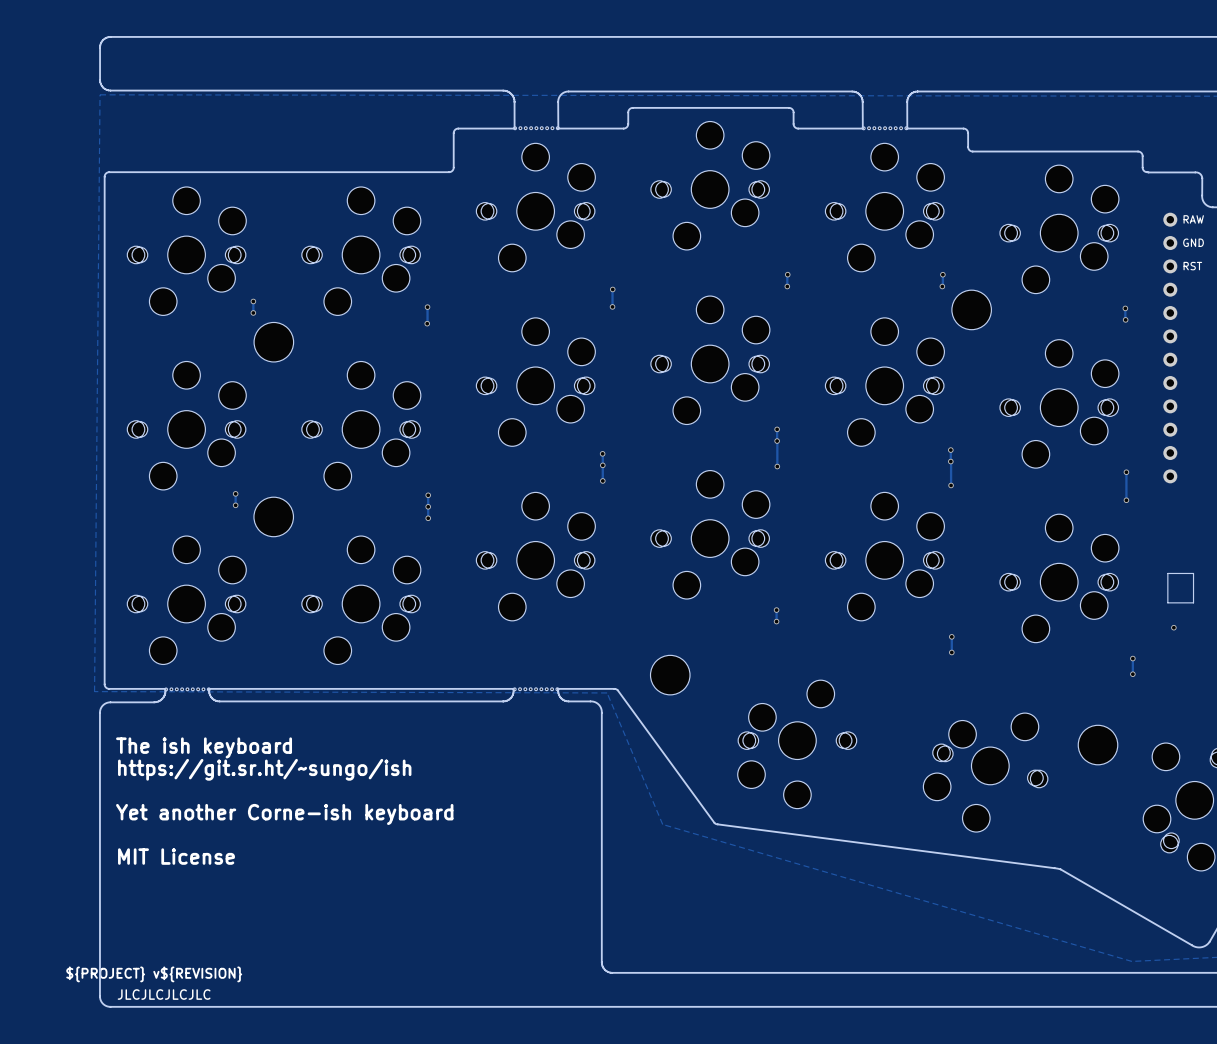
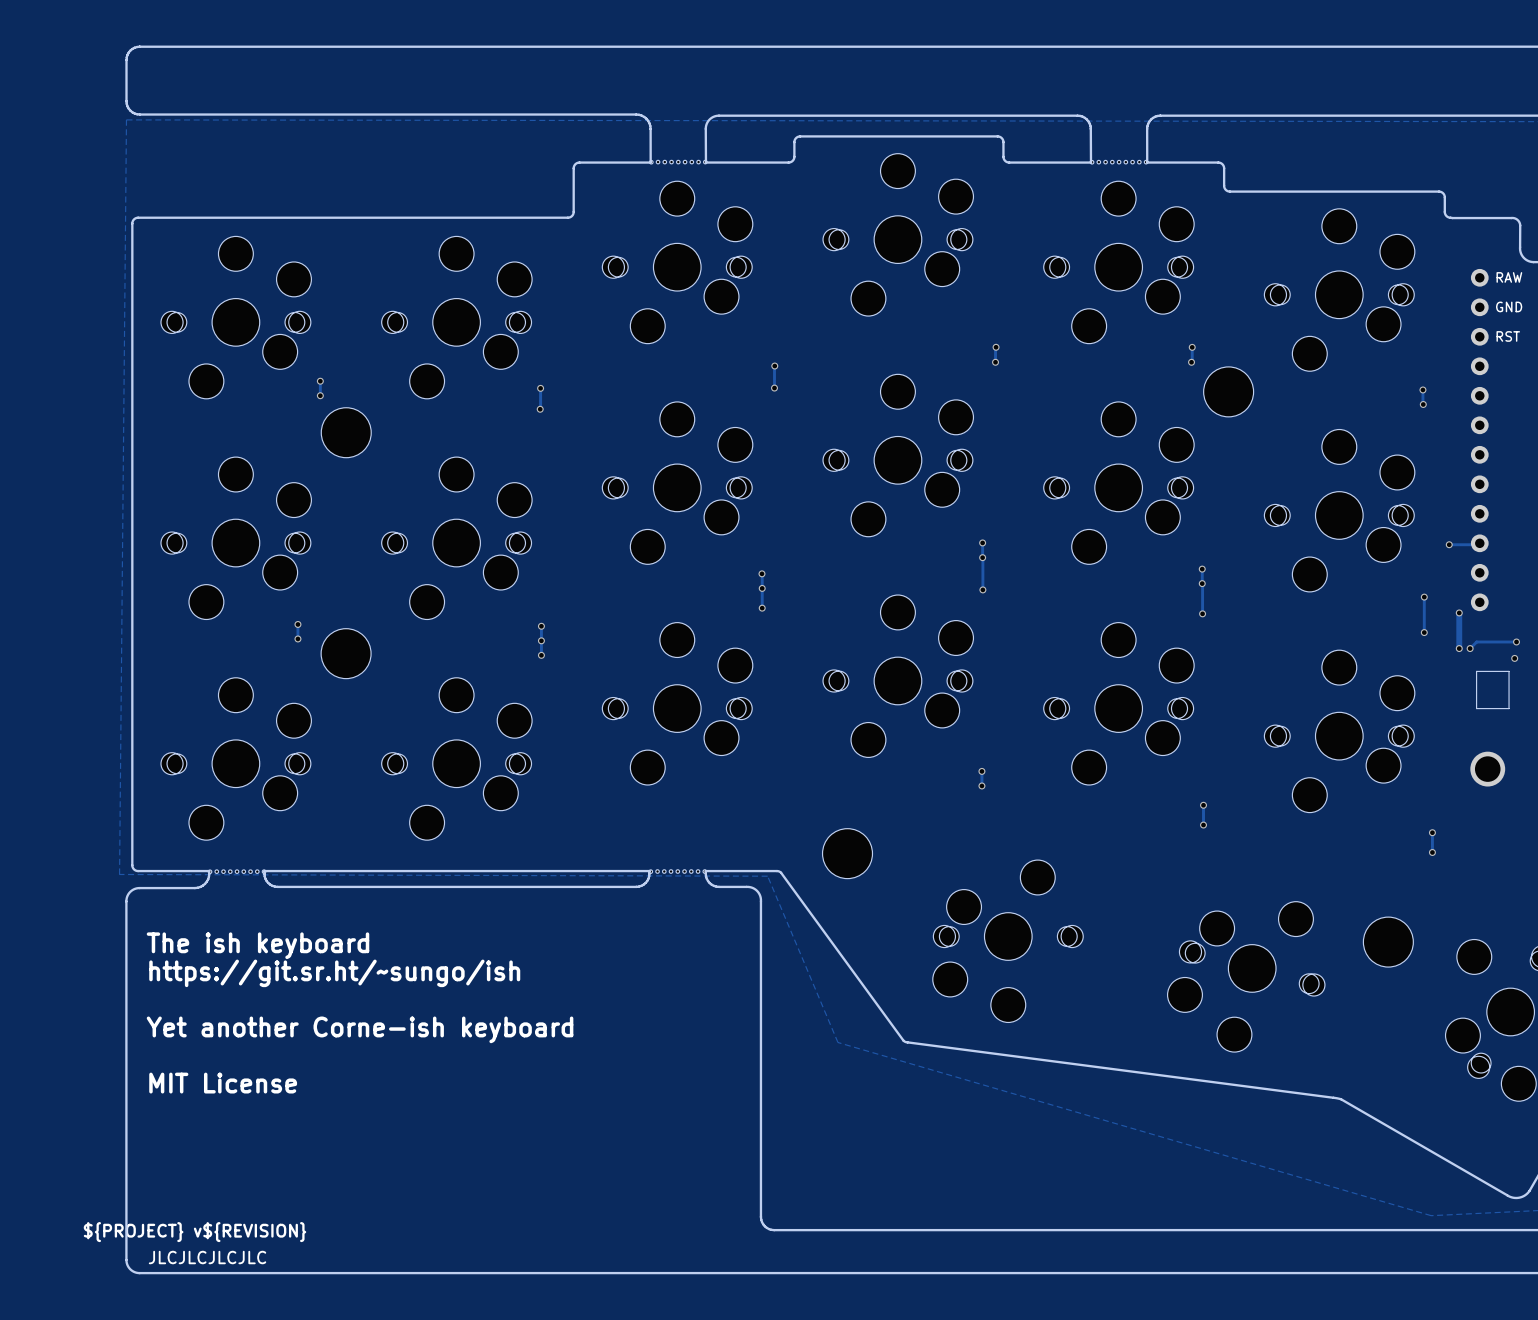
track: none -> (1449, 544) (1478, 544)
via: none -> (1449, 544)
track: none -> (1459, 612) (1459, 648)
via: none -> (1459, 612)
track: none -> (1516, 641) (1476, 641) (1470, 648)
via: none -> (1516, 641)
via: none -> (1459, 648)
via: none -> (1470, 648)
via: none -> (1514, 658)
part position: (1180, 588) -> (1492, 690)
part: none -> (1487, 769)
via: (1173, 627) -> none

